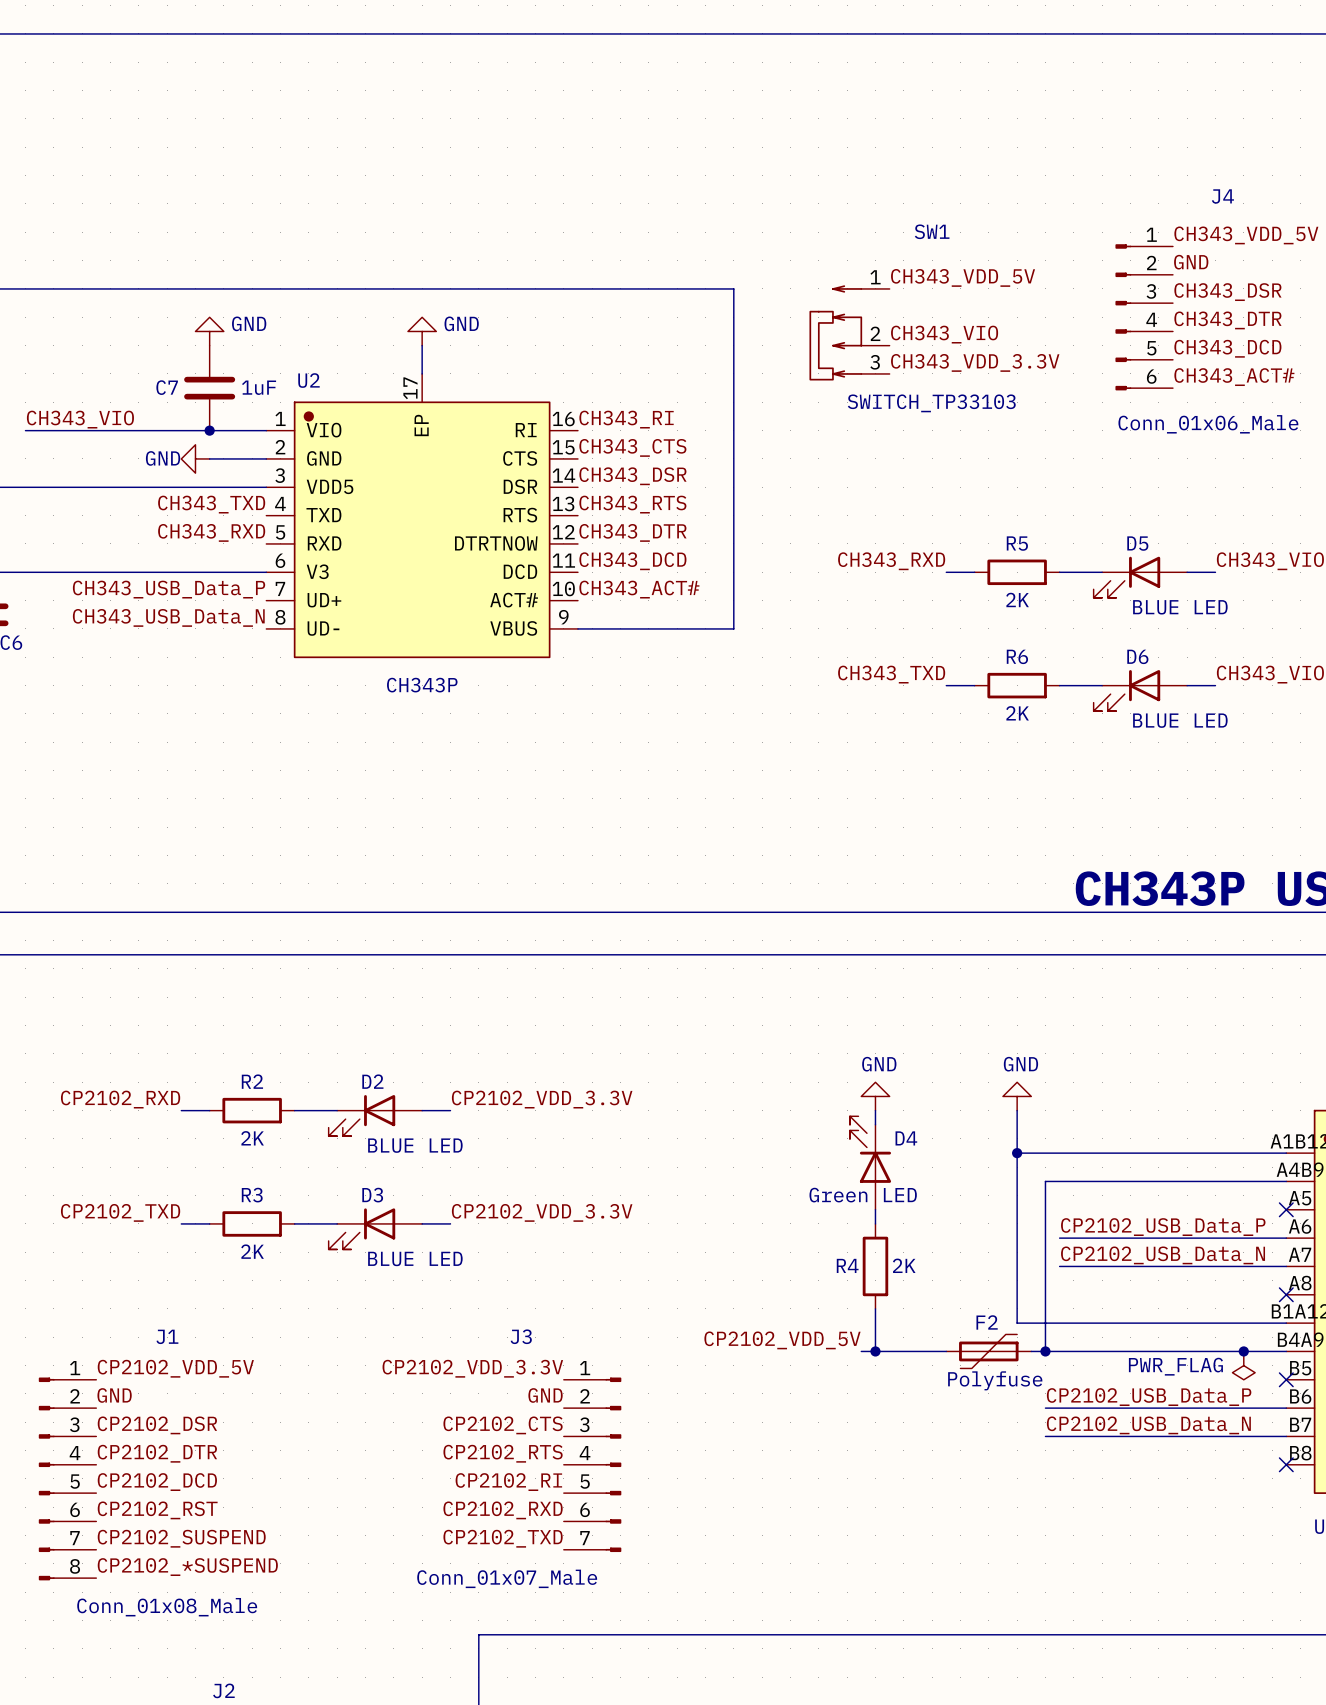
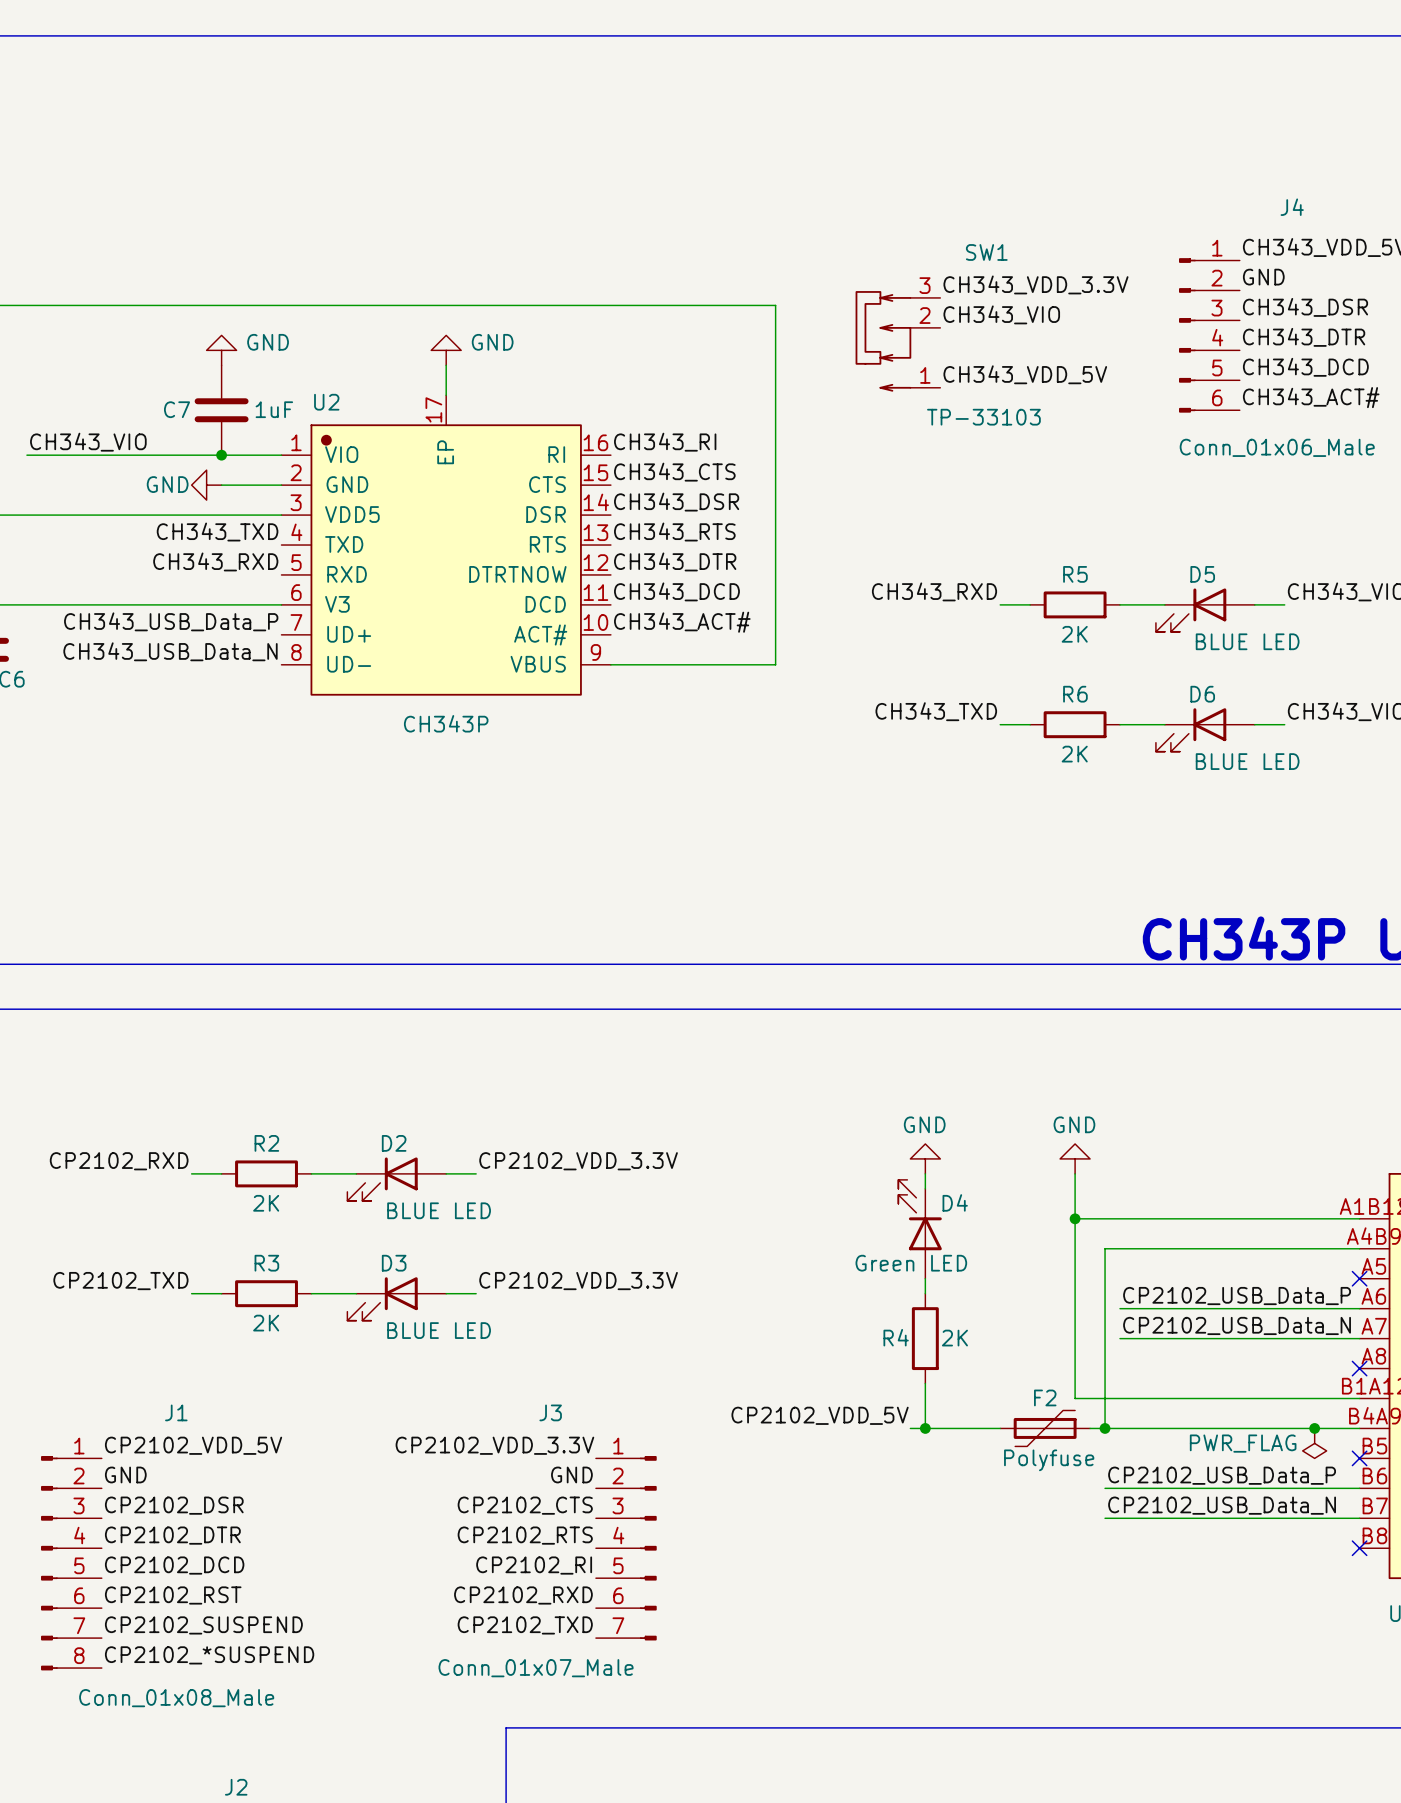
label: CH343_VDD_5V (963, 277) -> CH343_VDD_3.3V (1035, 284)
SW1 flip: as is (835, 332) -> up-down (883, 341)
label position: CH343_VIO (944, 334) -> CH343_VIO (1001, 314)
label: CH343_VDD_3.3V (975, 362) -> CH343_VDD_5V (1025, 374)
SW1 value: SWITCH_TP33103 (931, 403) -> TP-33103 (983, 417)

